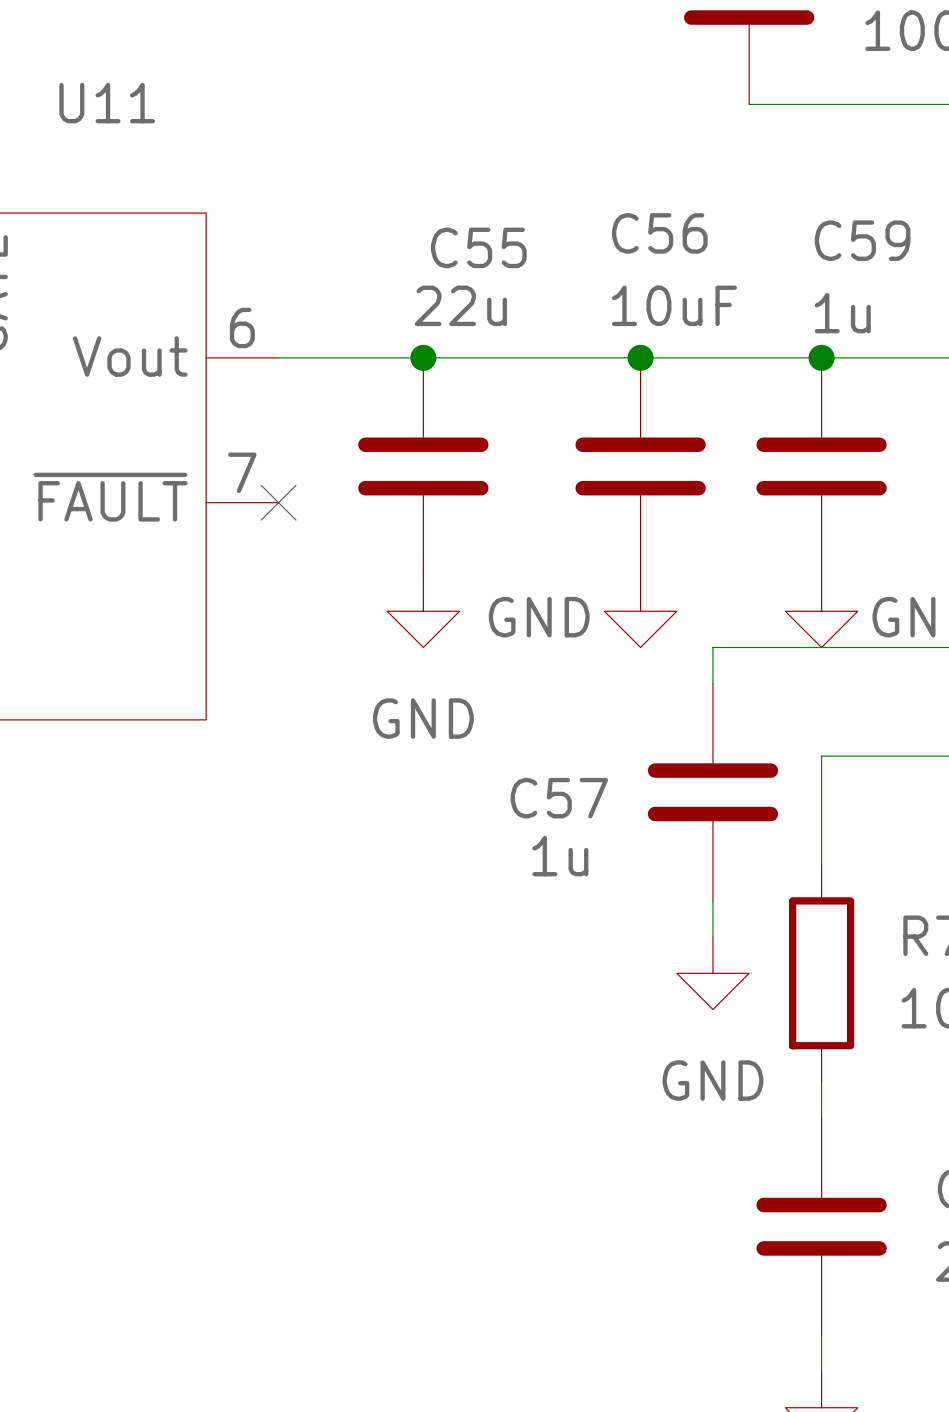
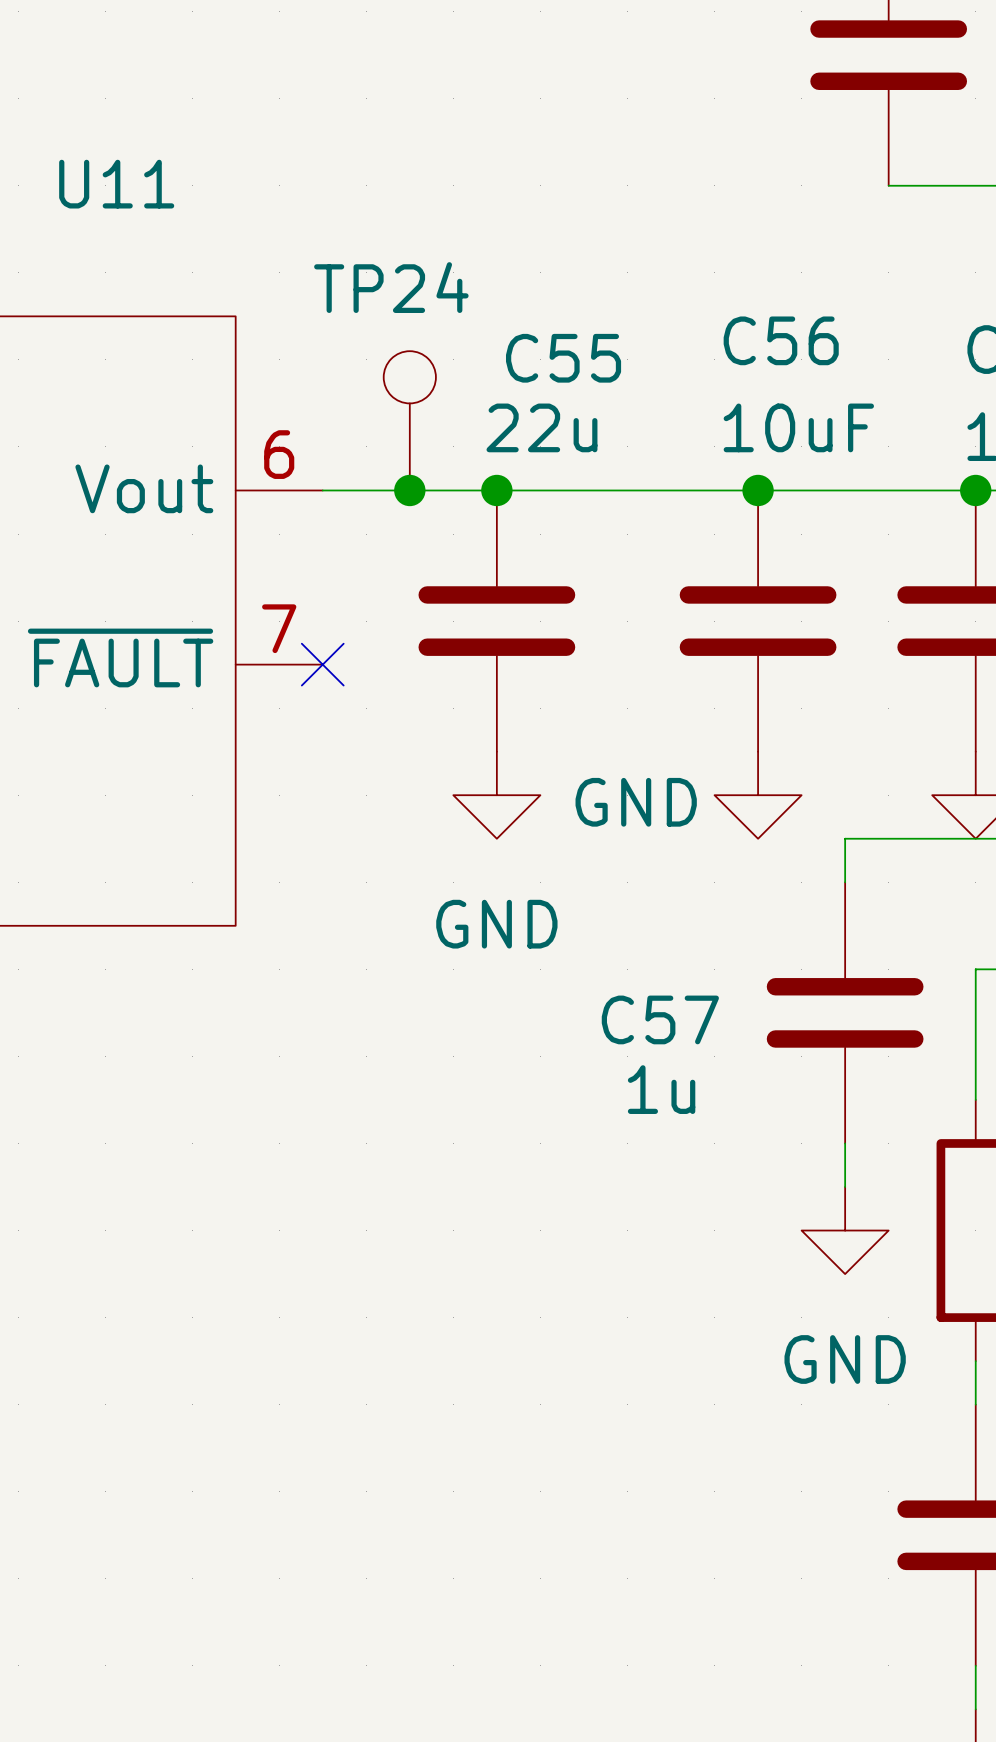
TP24: none -> (409, 420)
junction: none -> (409, 490)

